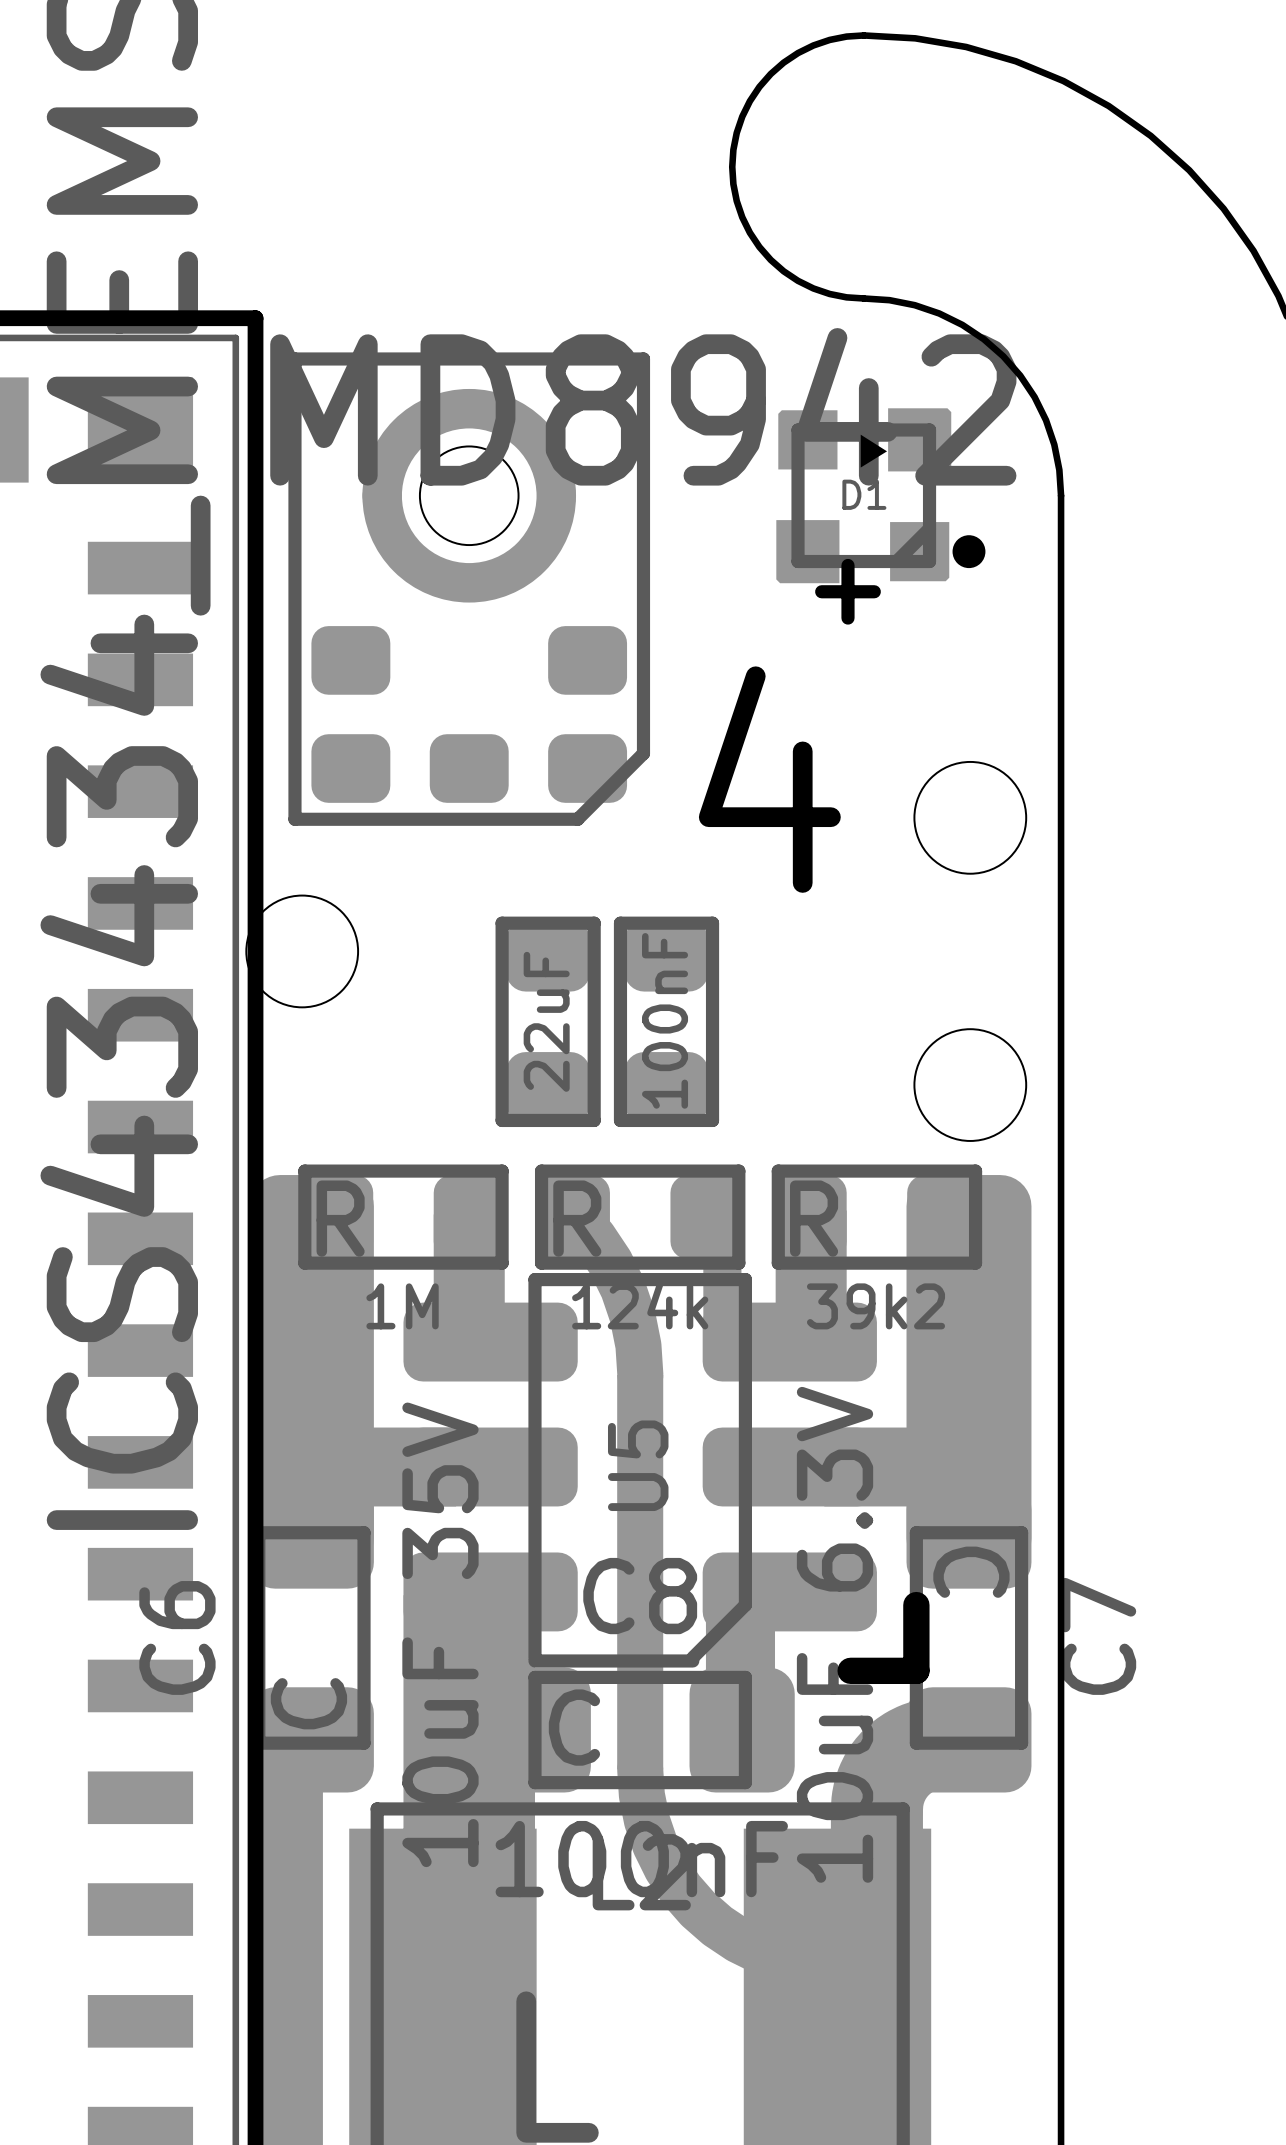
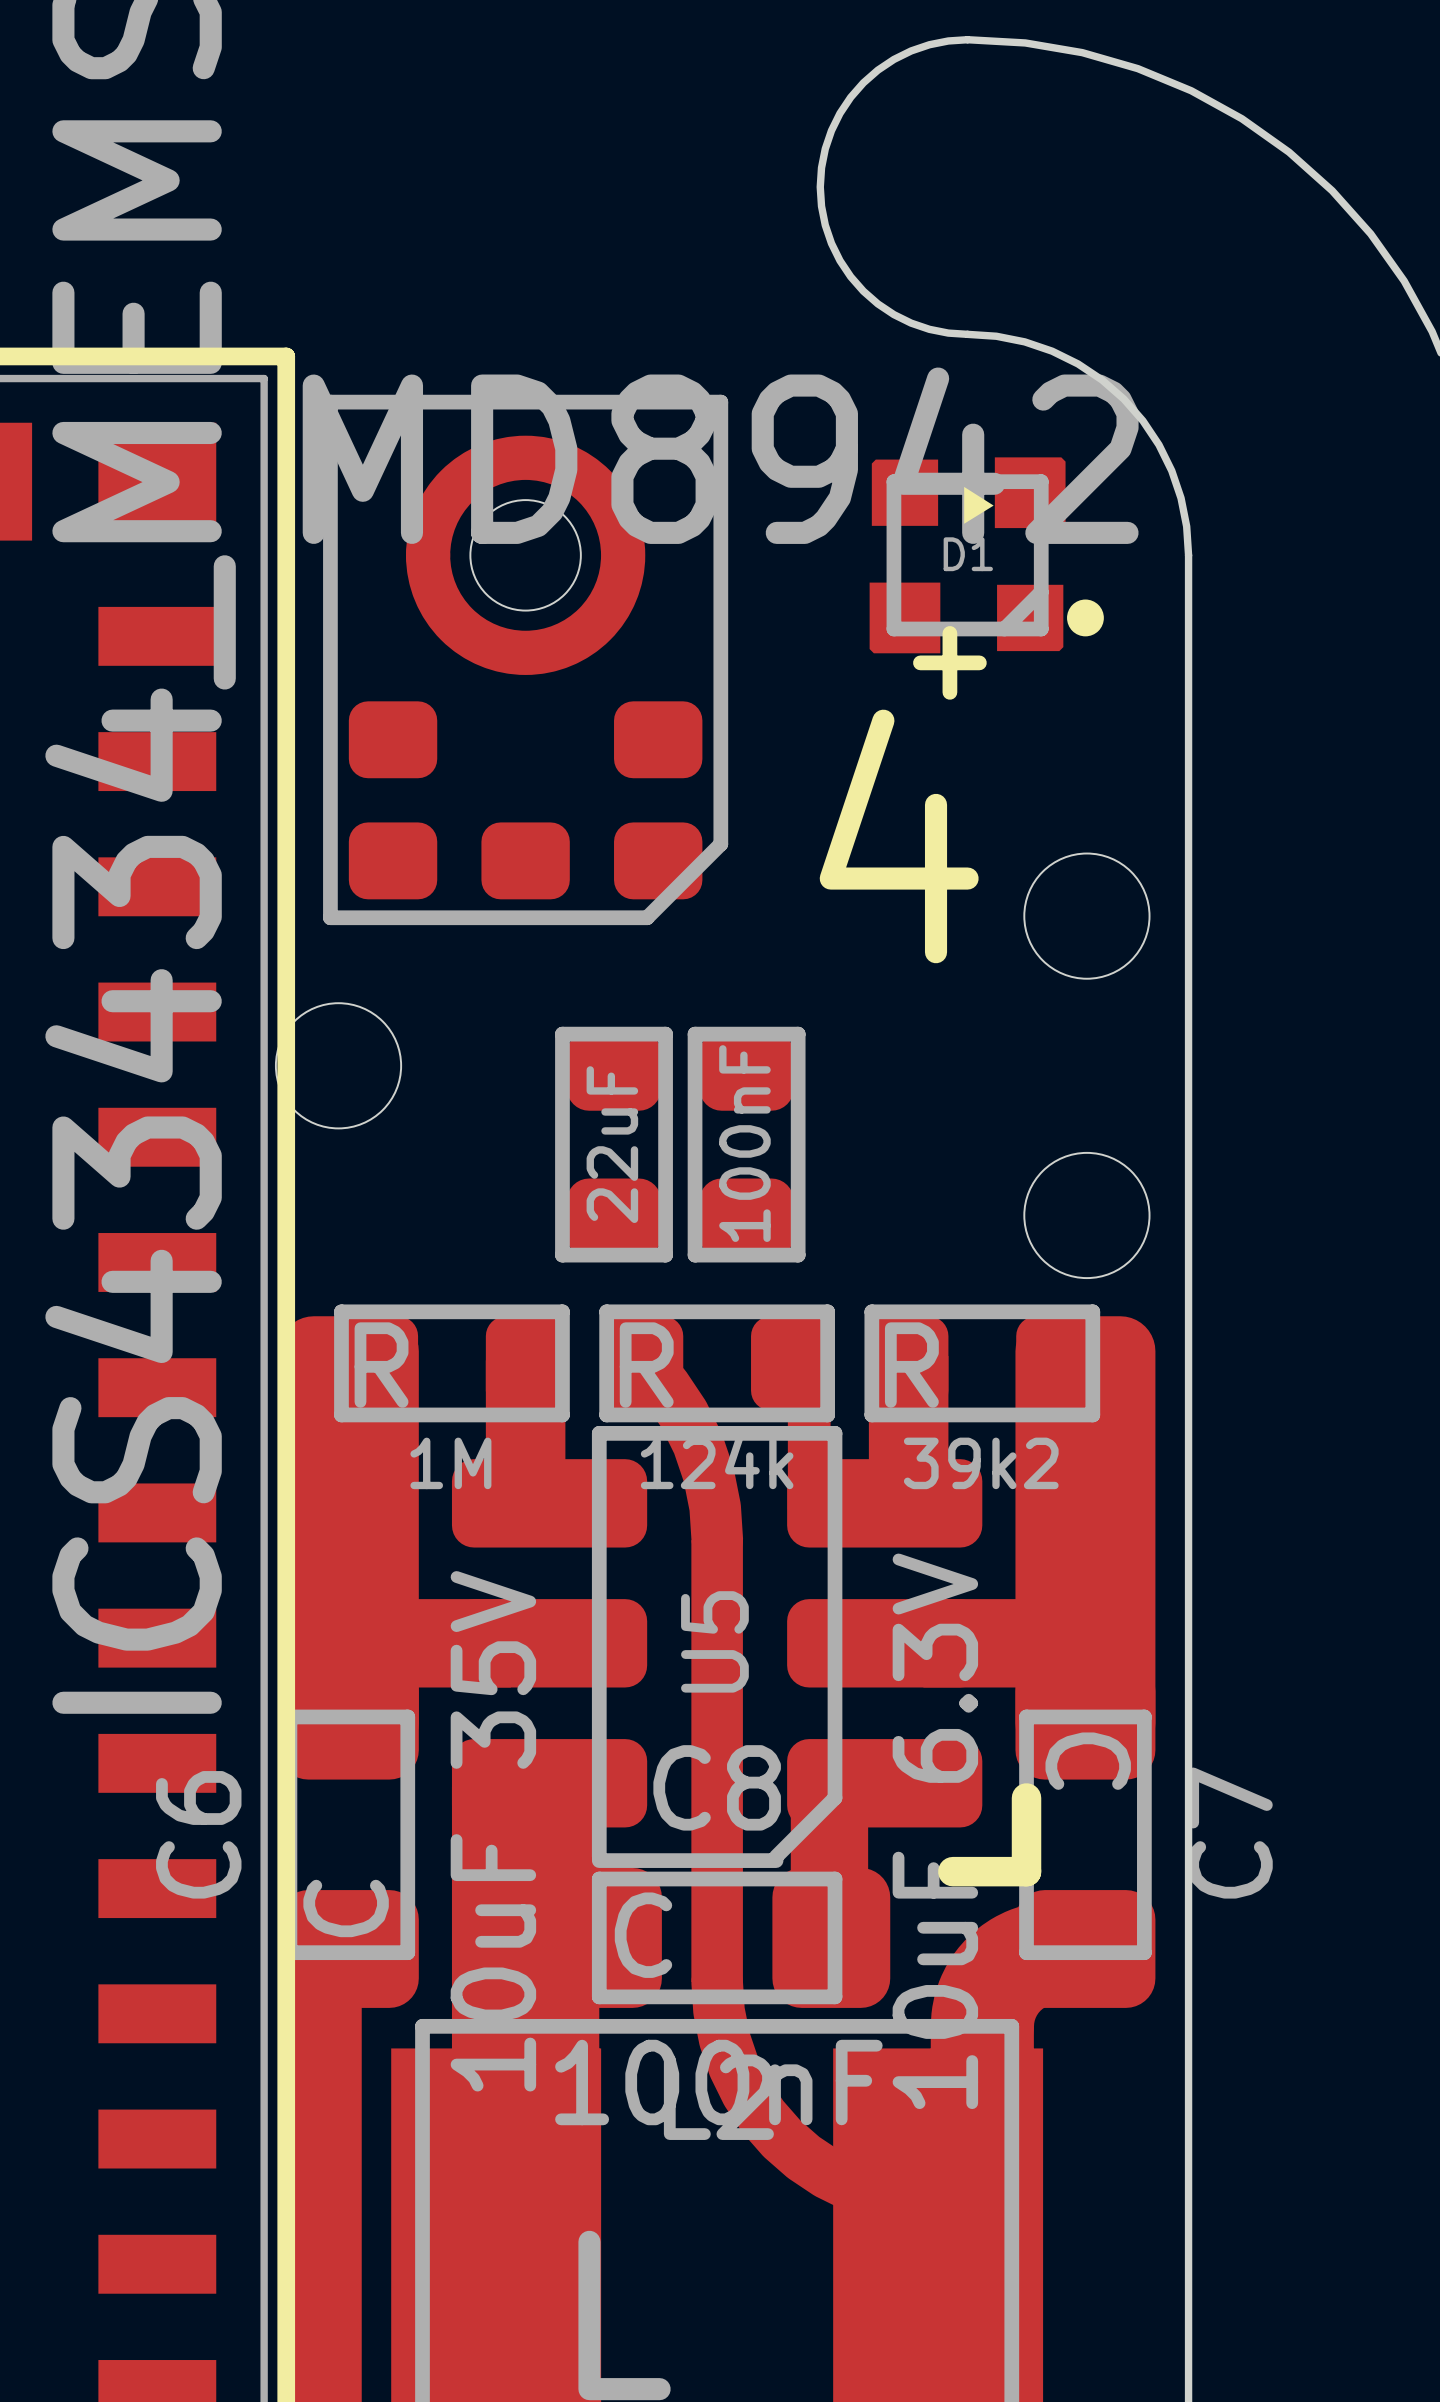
text position: 4 (769, 779) -> 4 (899, 836)

